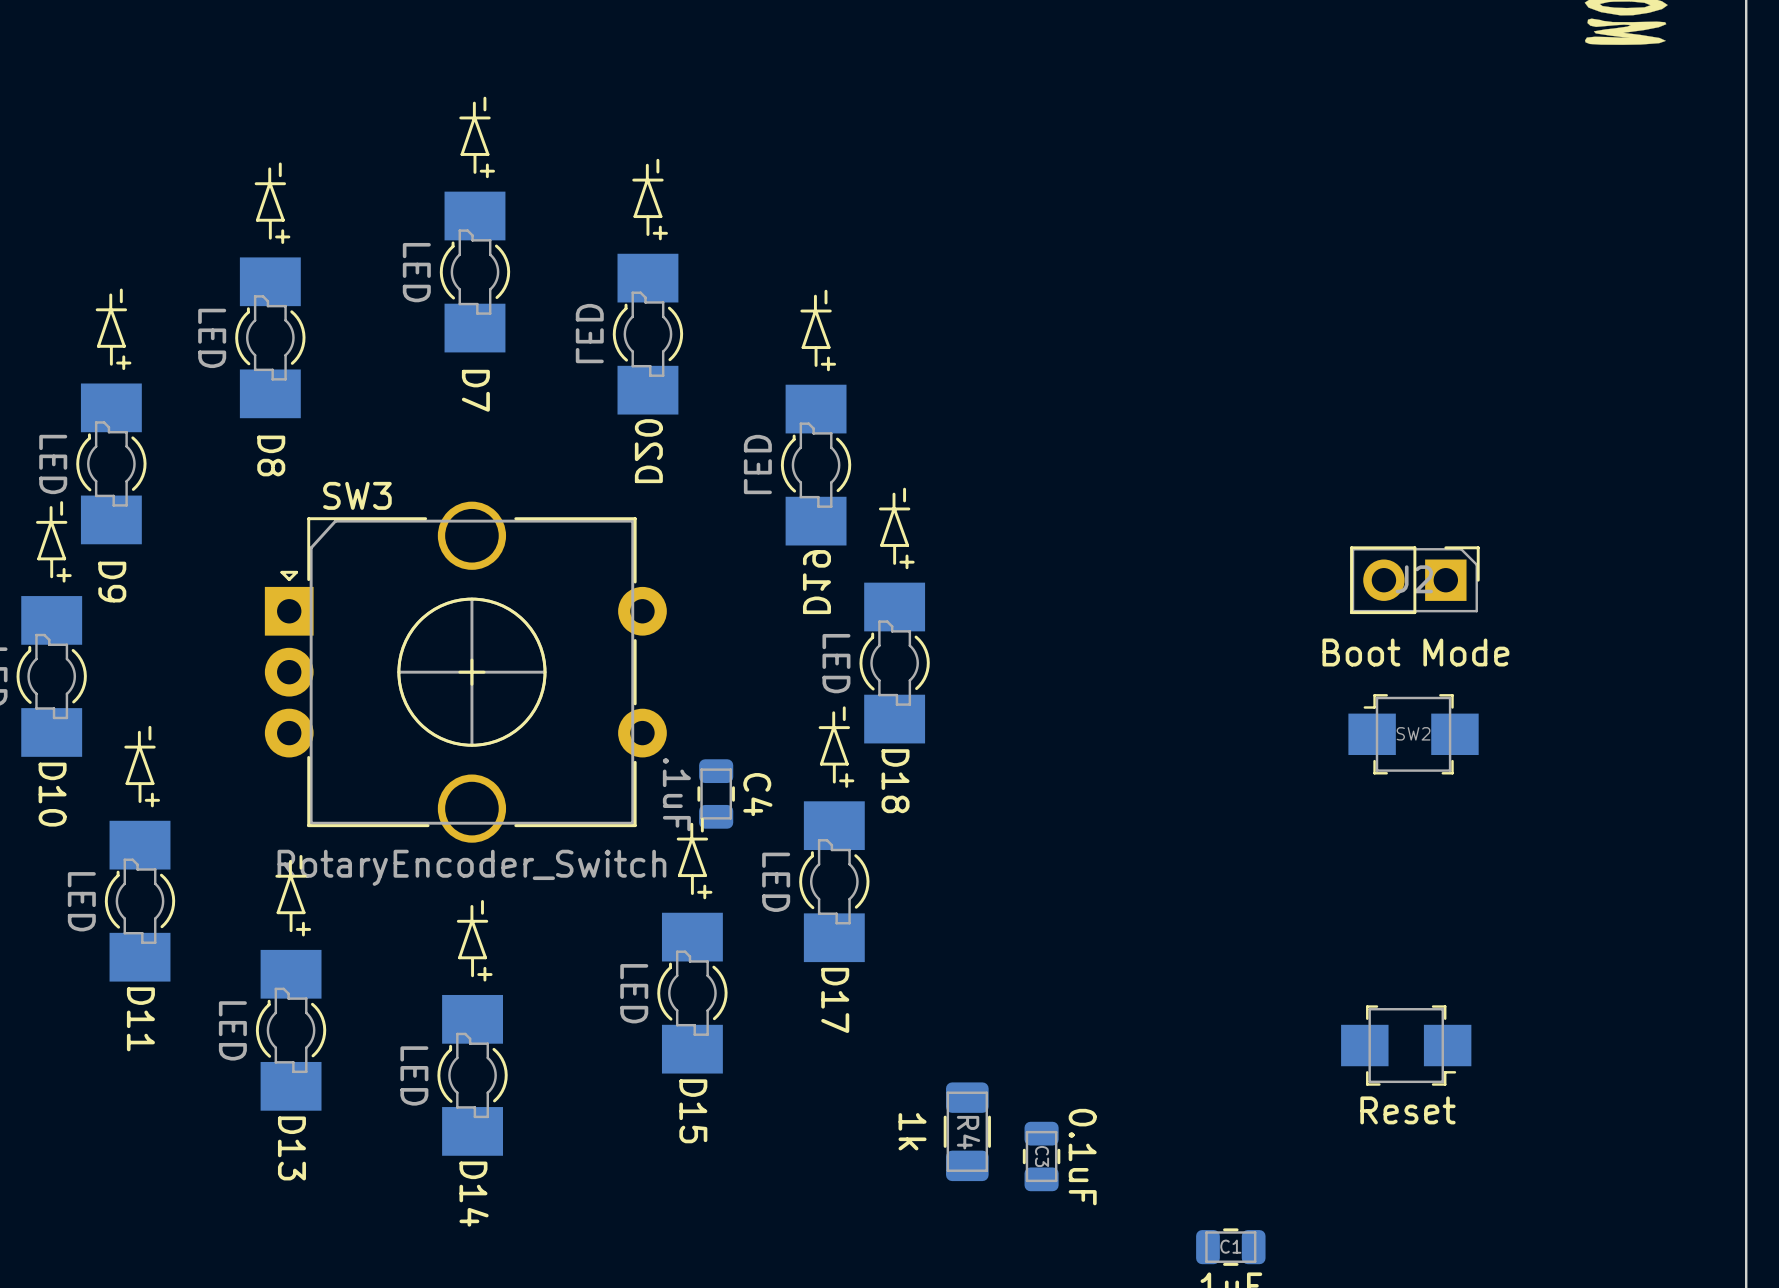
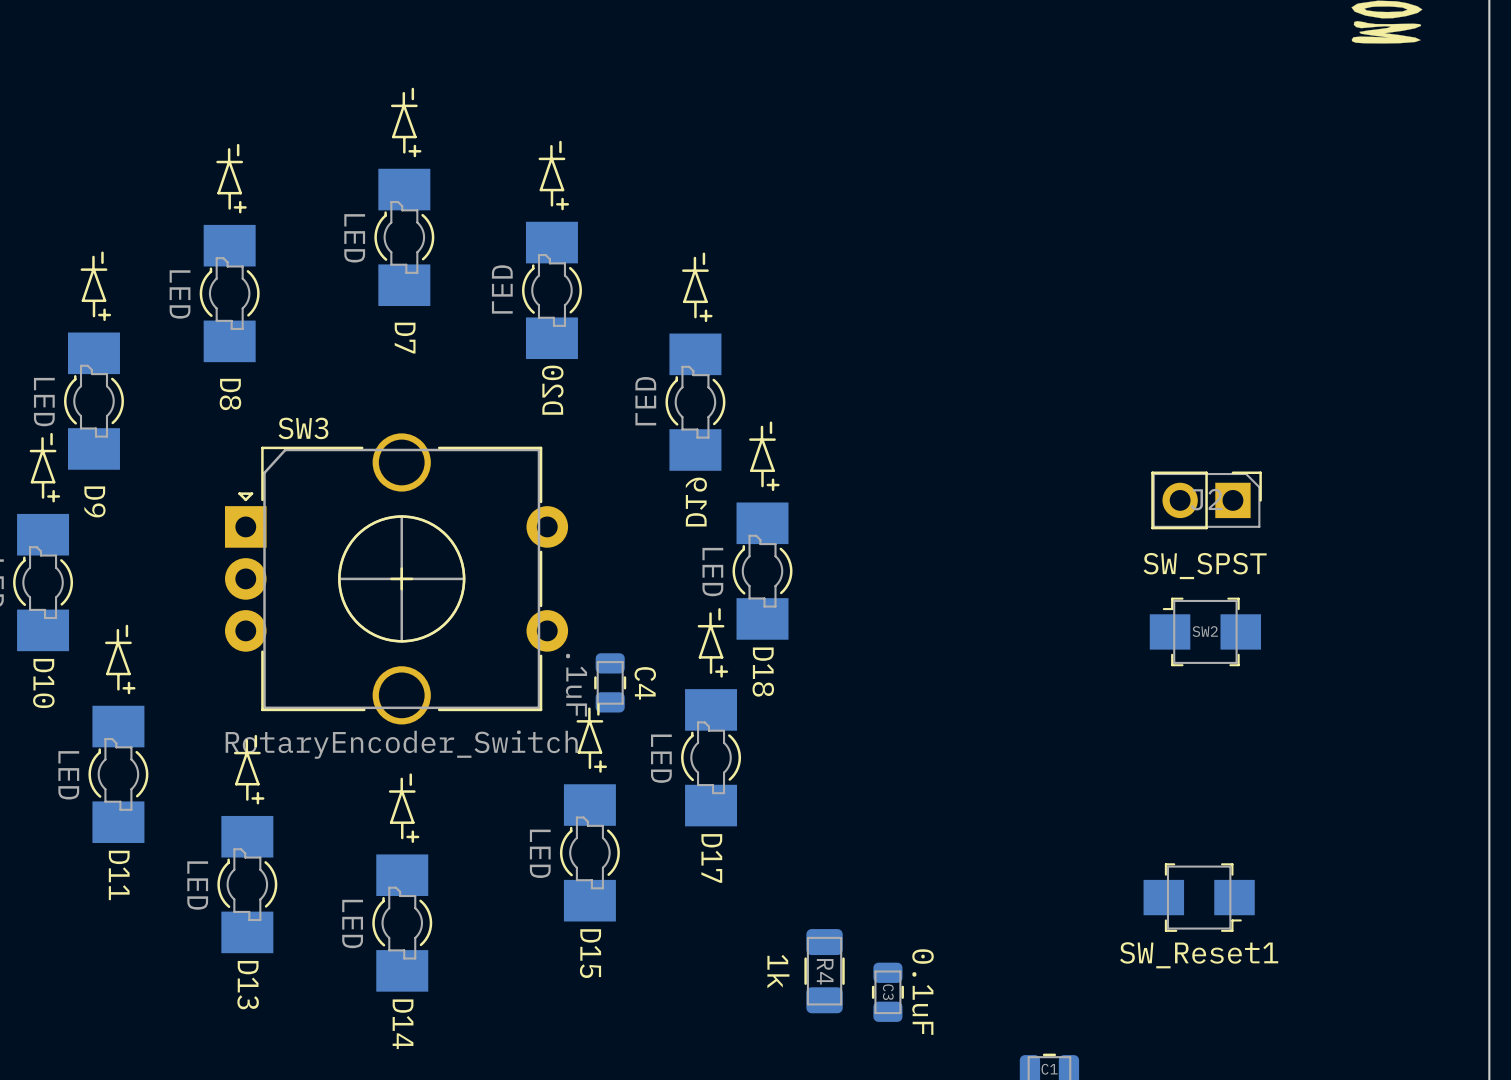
SW2 value: Boot Mode (1415, 652) -> SW_SPST (1205, 566)
Reset name: Reset (1407, 1110) -> SW_Reset1 (1199, 955)

